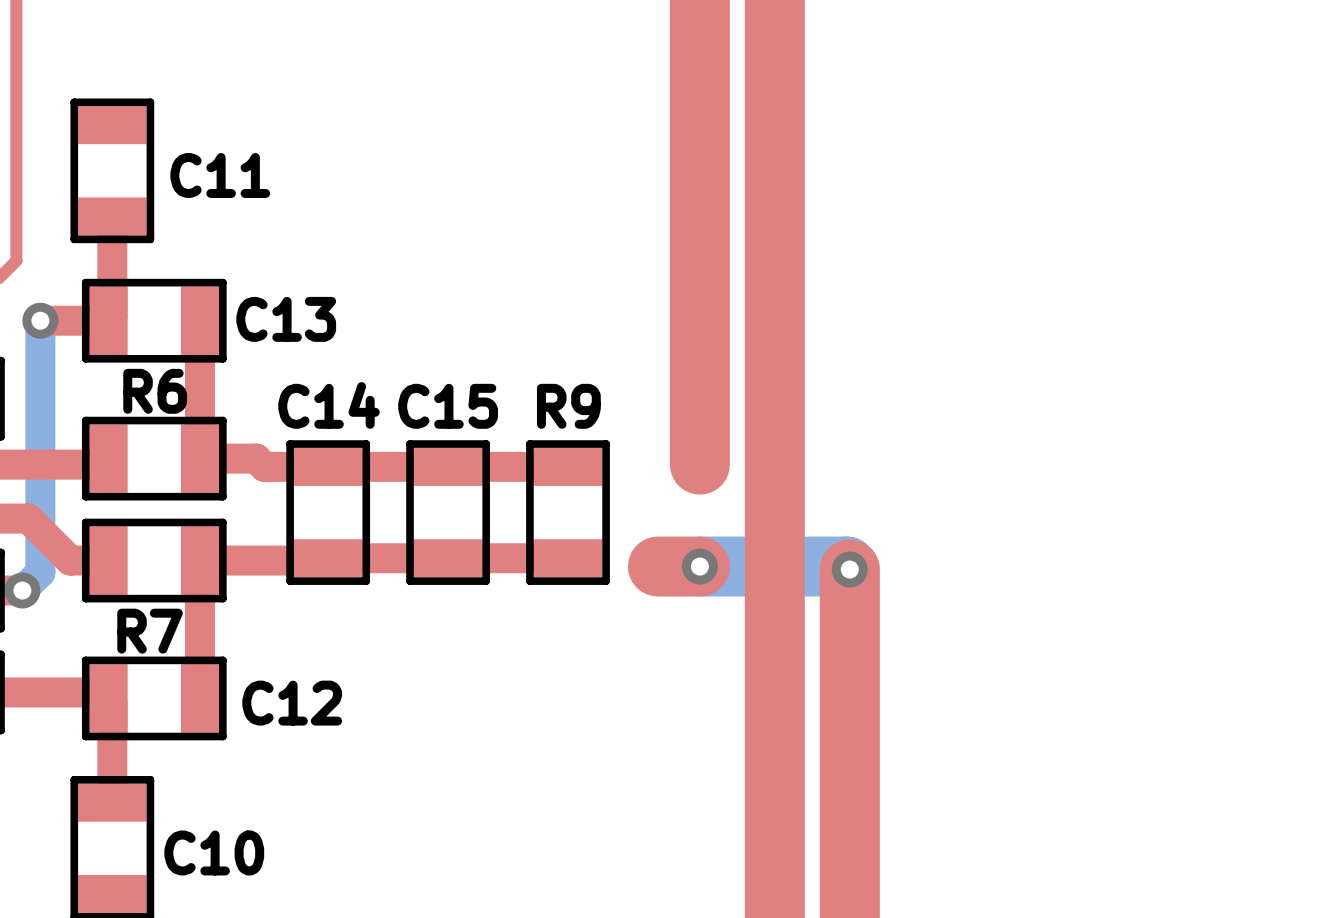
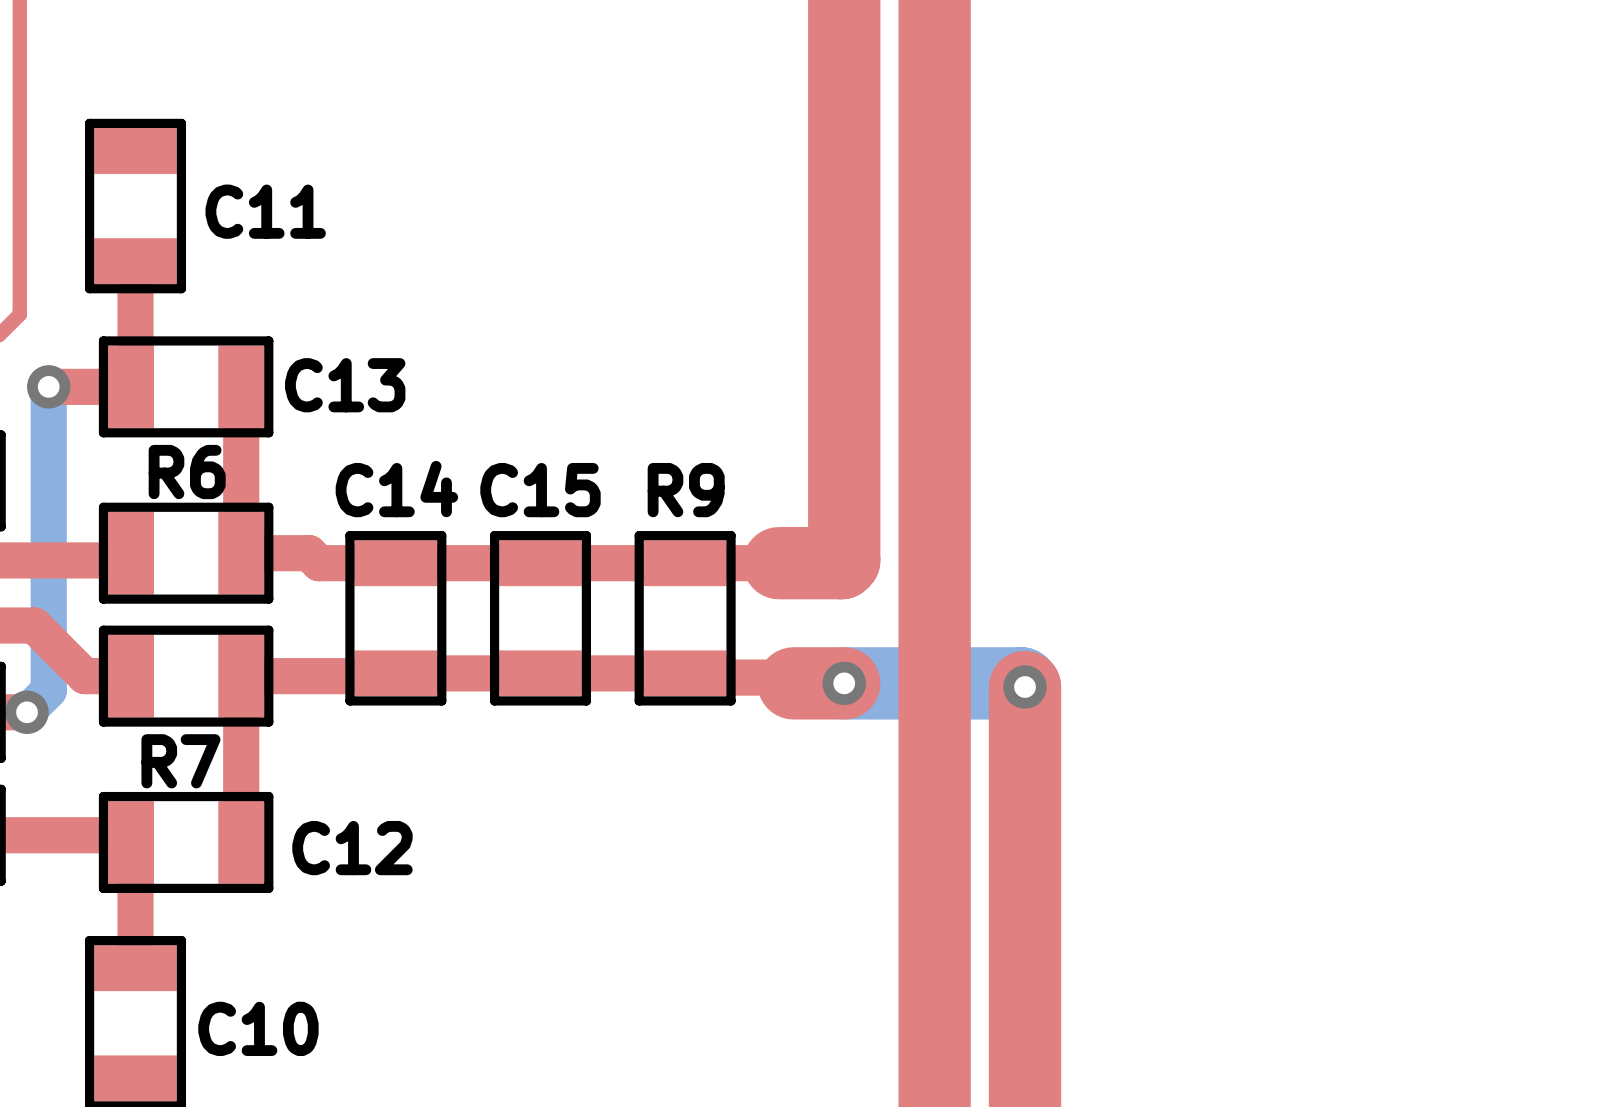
top track: none -> (844, 560) (841, 563) (685, 563)
top track: none -> (685, 673) (723, 673) (727, 677) (766, 677)

